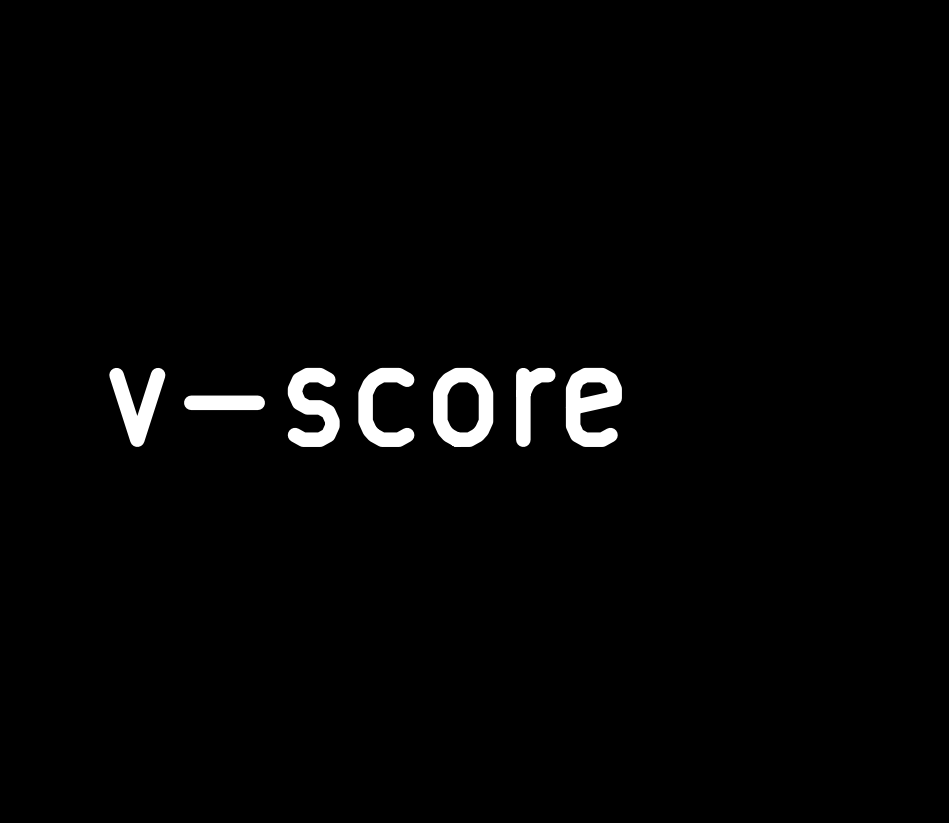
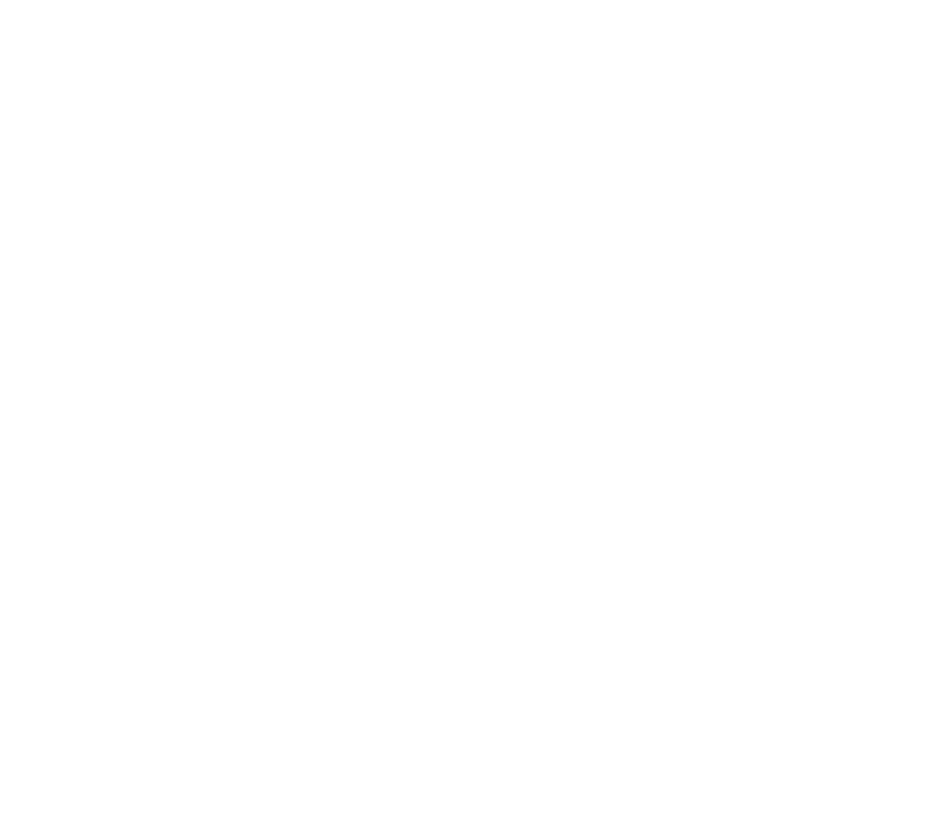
text: v-score (365, 407) -> none

